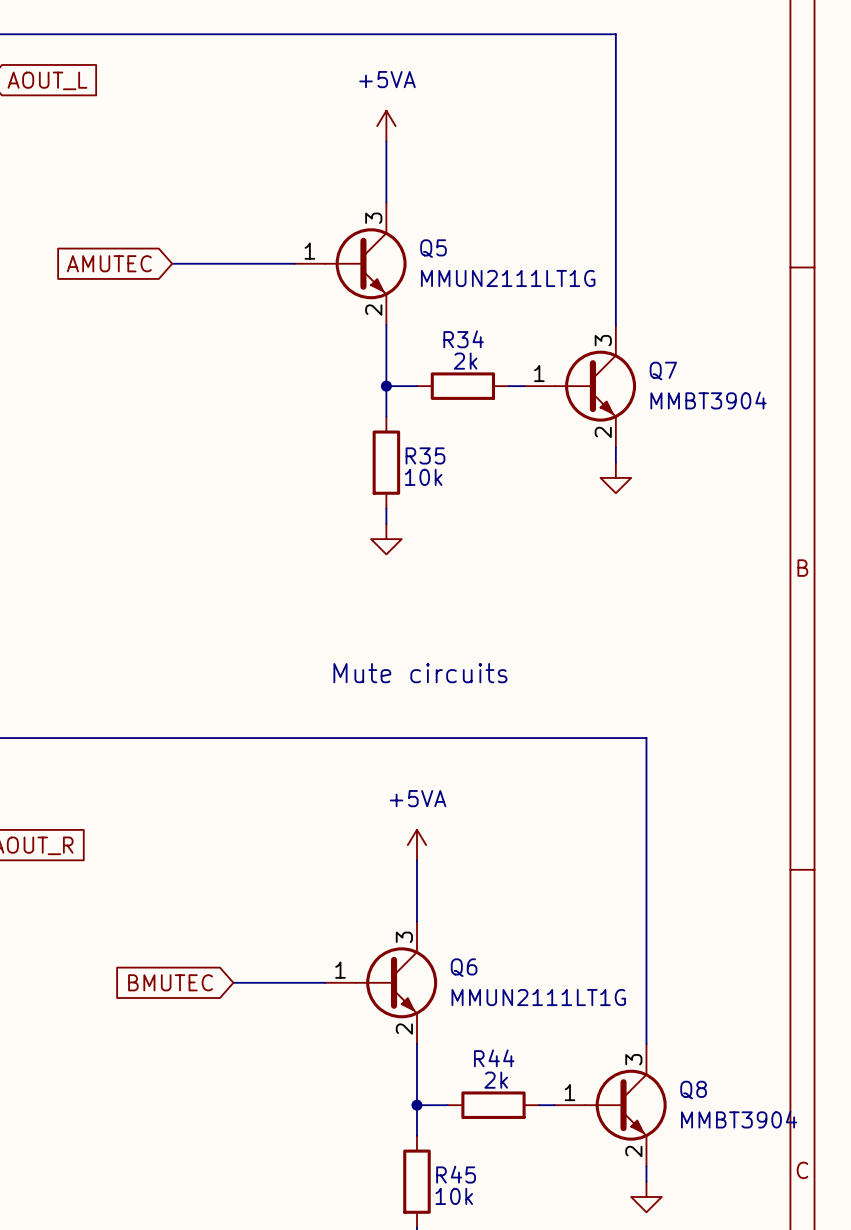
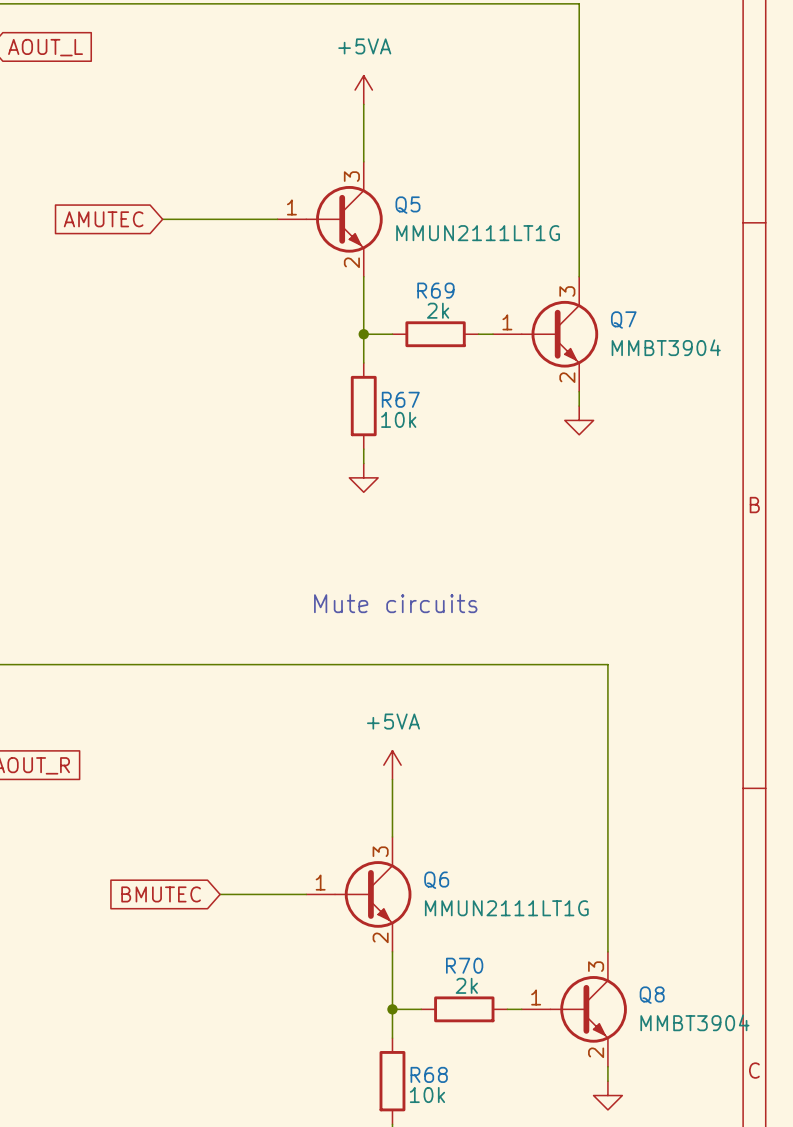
R34 name: R34 (463, 339) -> R69 (435, 290)
R35 name: R35 (425, 455) -> R67 (400, 399)
R44 name: R44 (494, 1058) -> R70 (464, 965)
R45 name: R45 (456, 1174) -> R68 (429, 1074)

